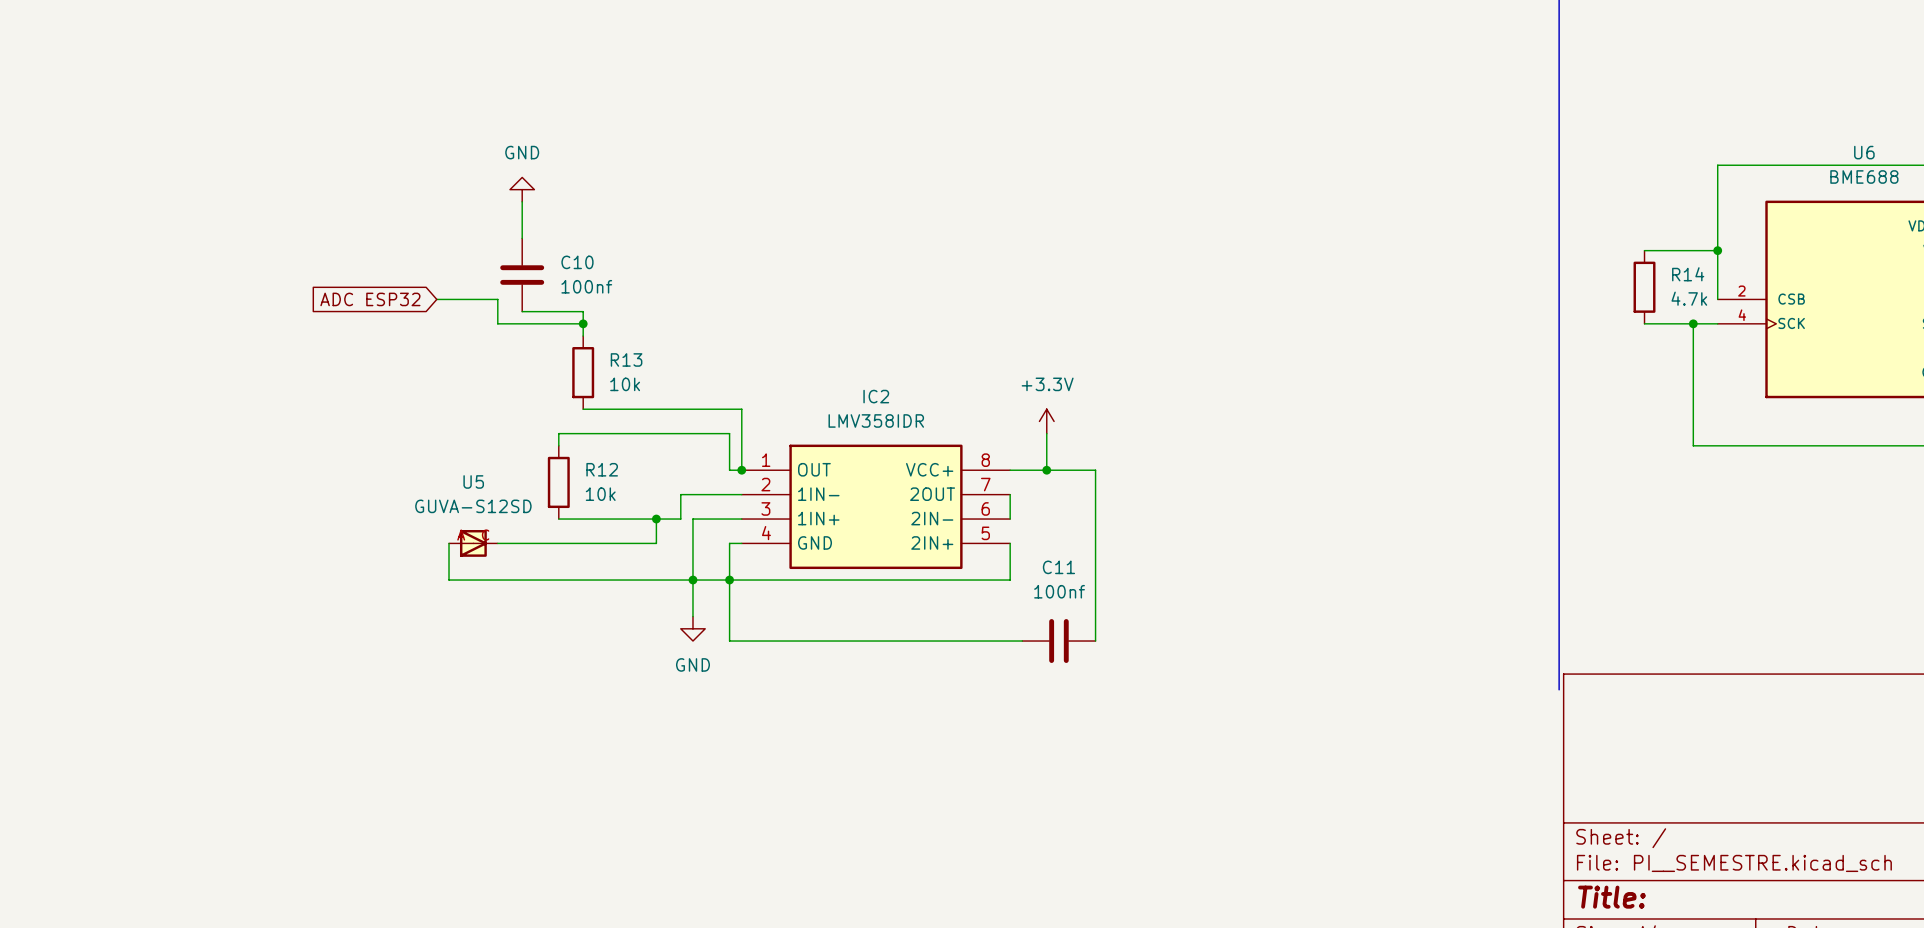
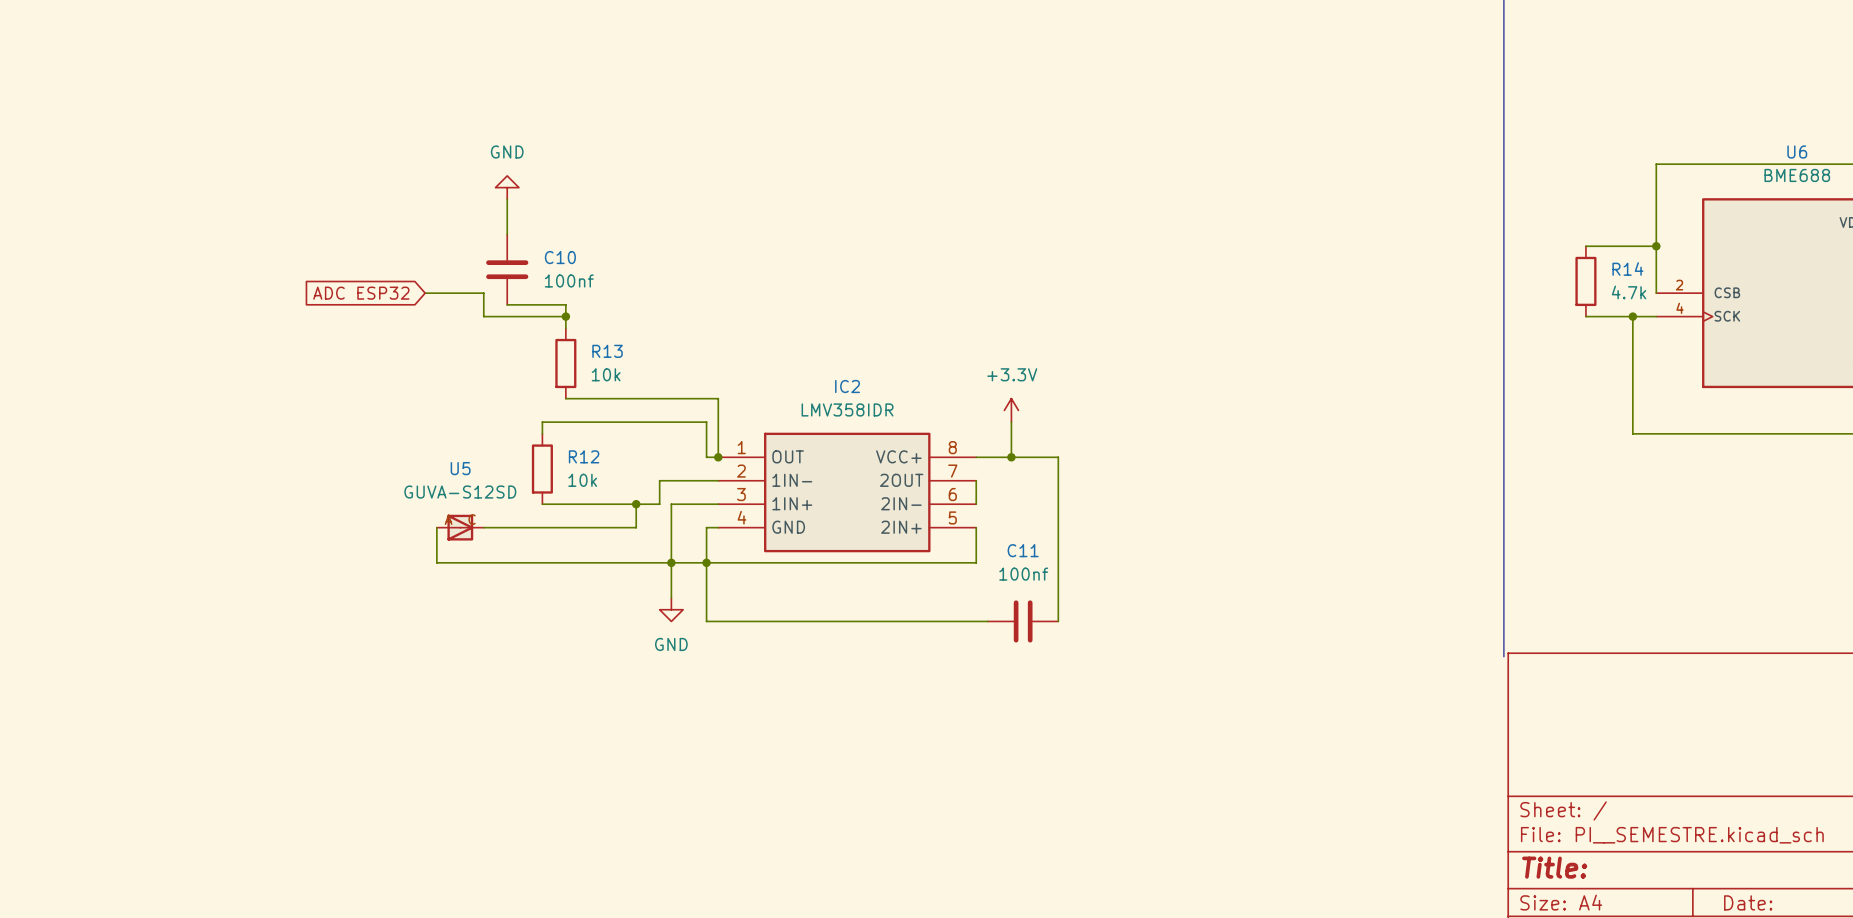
bus: (1559, 677) (1559, 689) -> none

